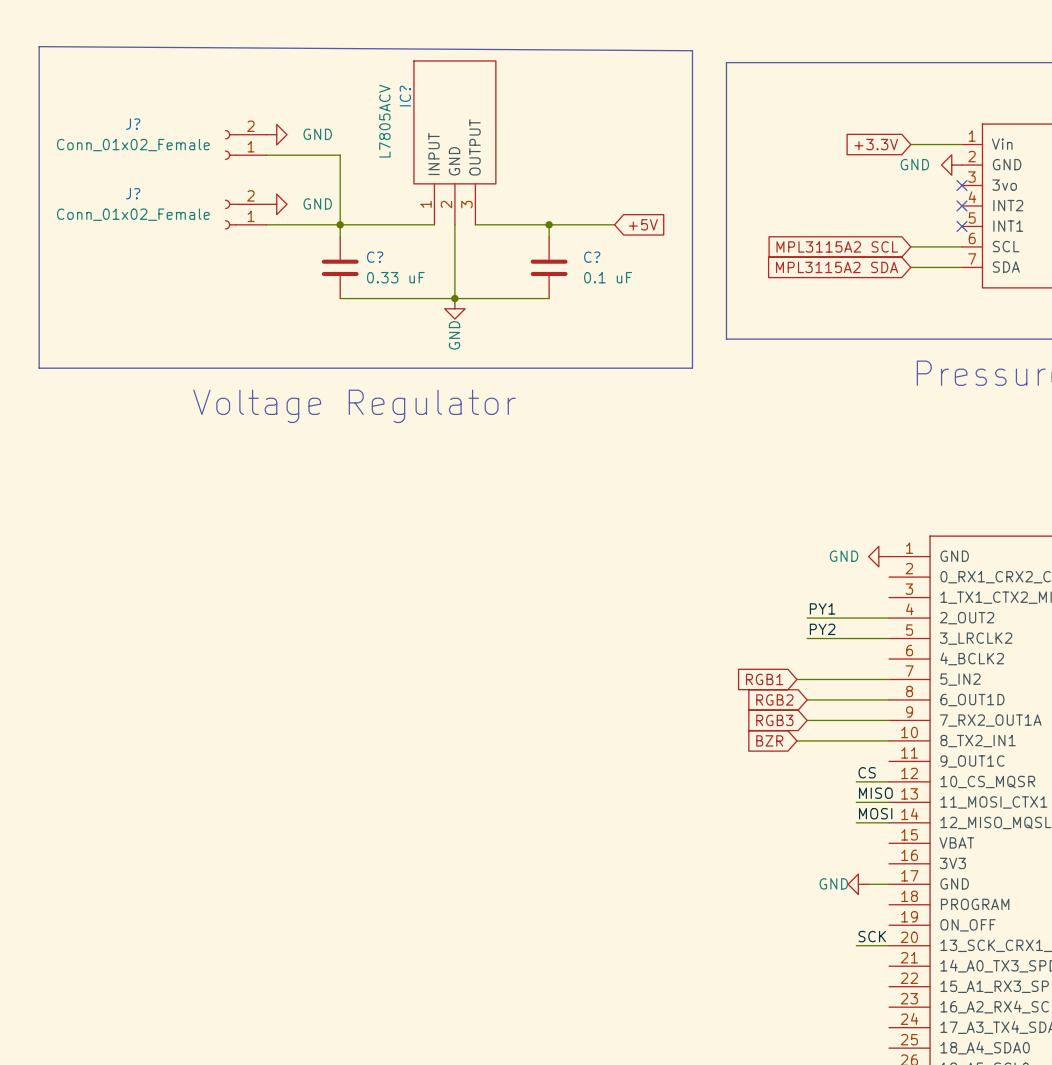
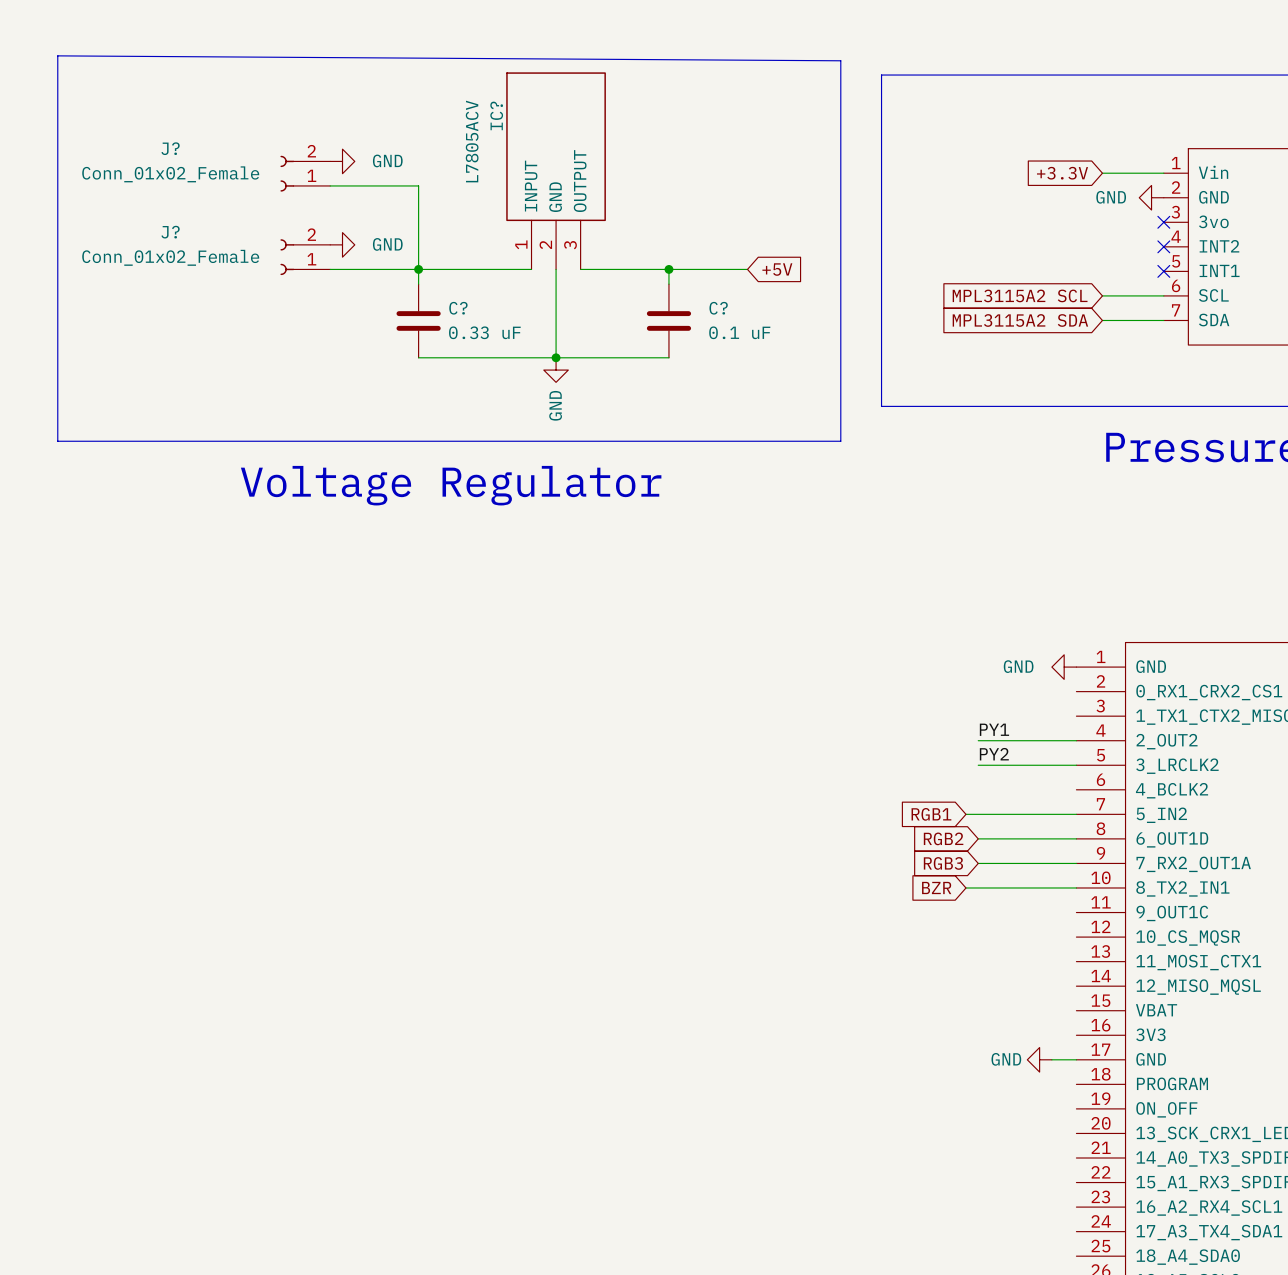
label: CS (867, 772) -> none
wire: (856, 781) (889, 781) -> none
label: MISO (875, 793) -> none
wire: (856, 802) (889, 802) -> none
label: MOSI (875, 813) -> none
wire: (856, 822) (889, 822) -> none
label: SCK (872, 936) -> none
wire: (856, 945) (889, 945) -> none

